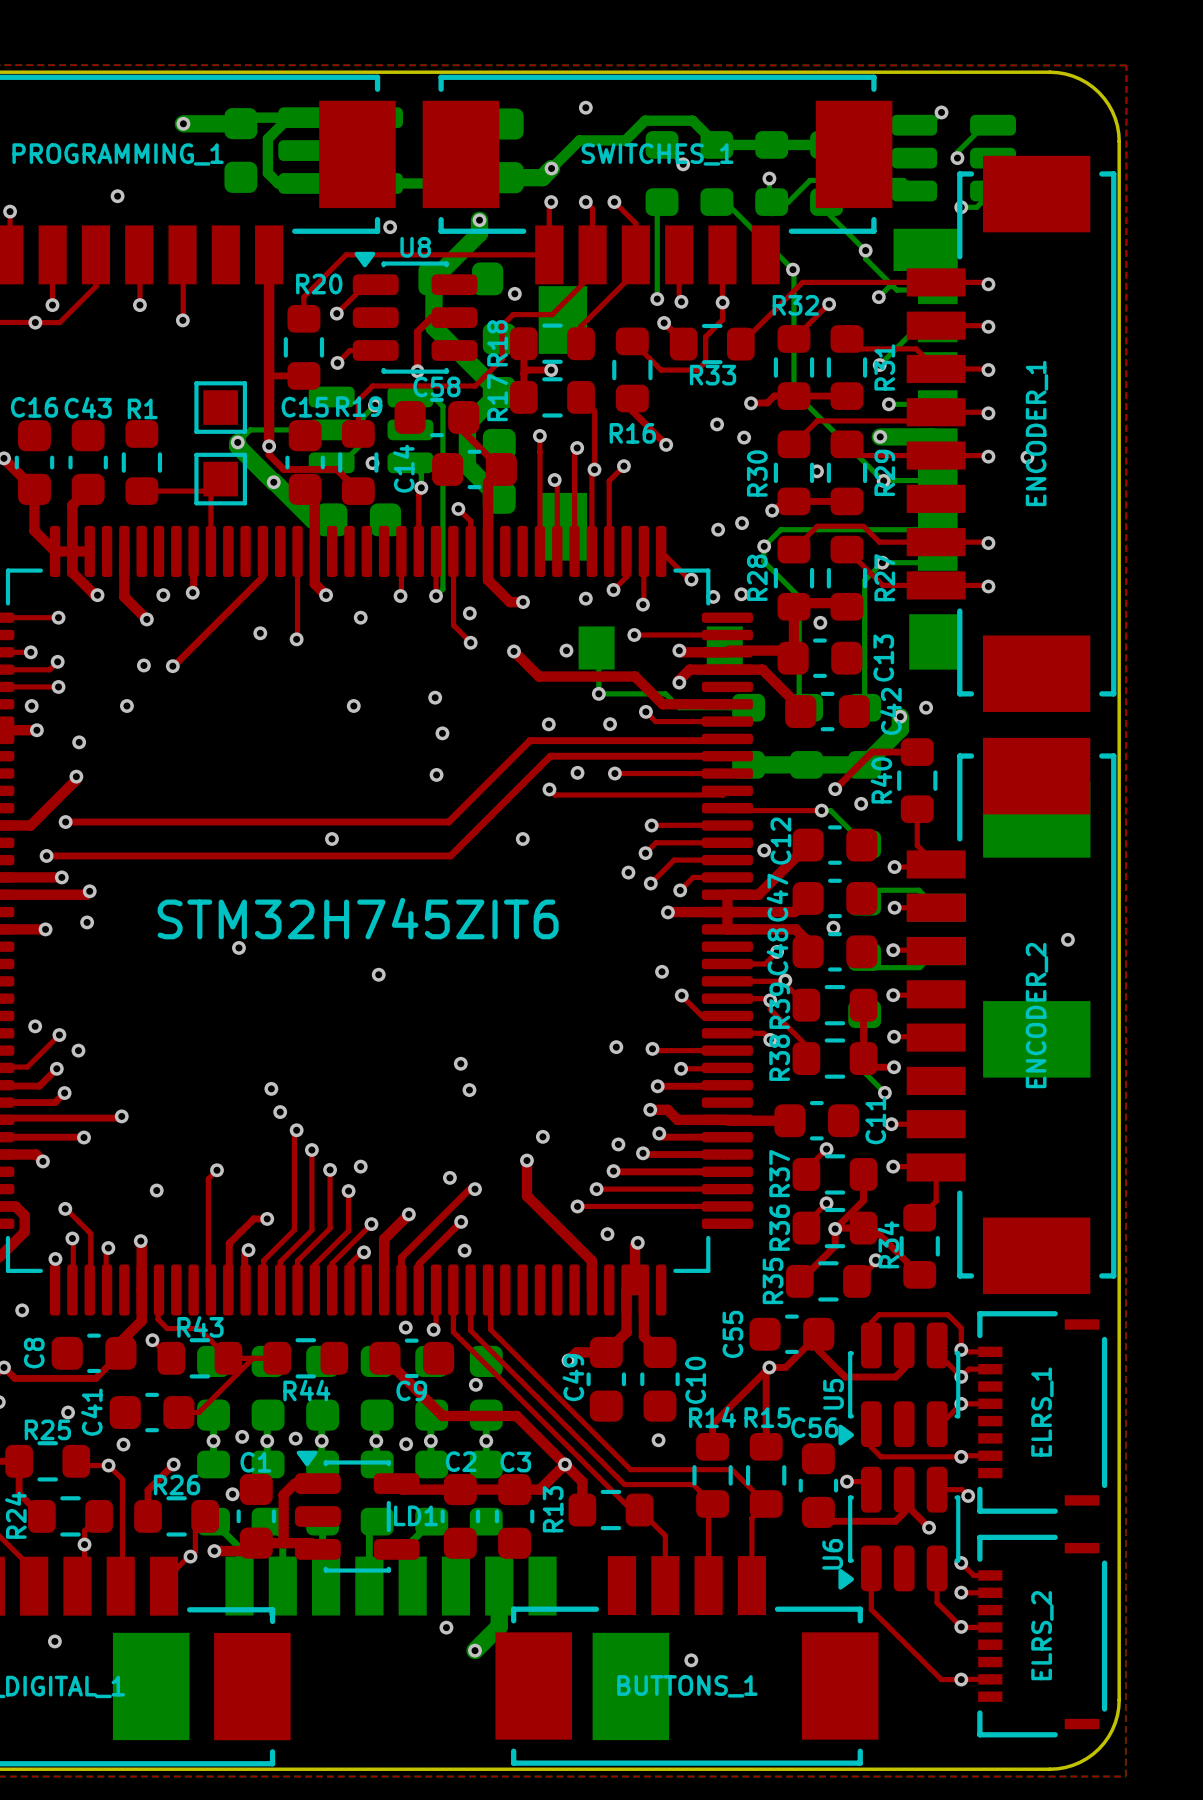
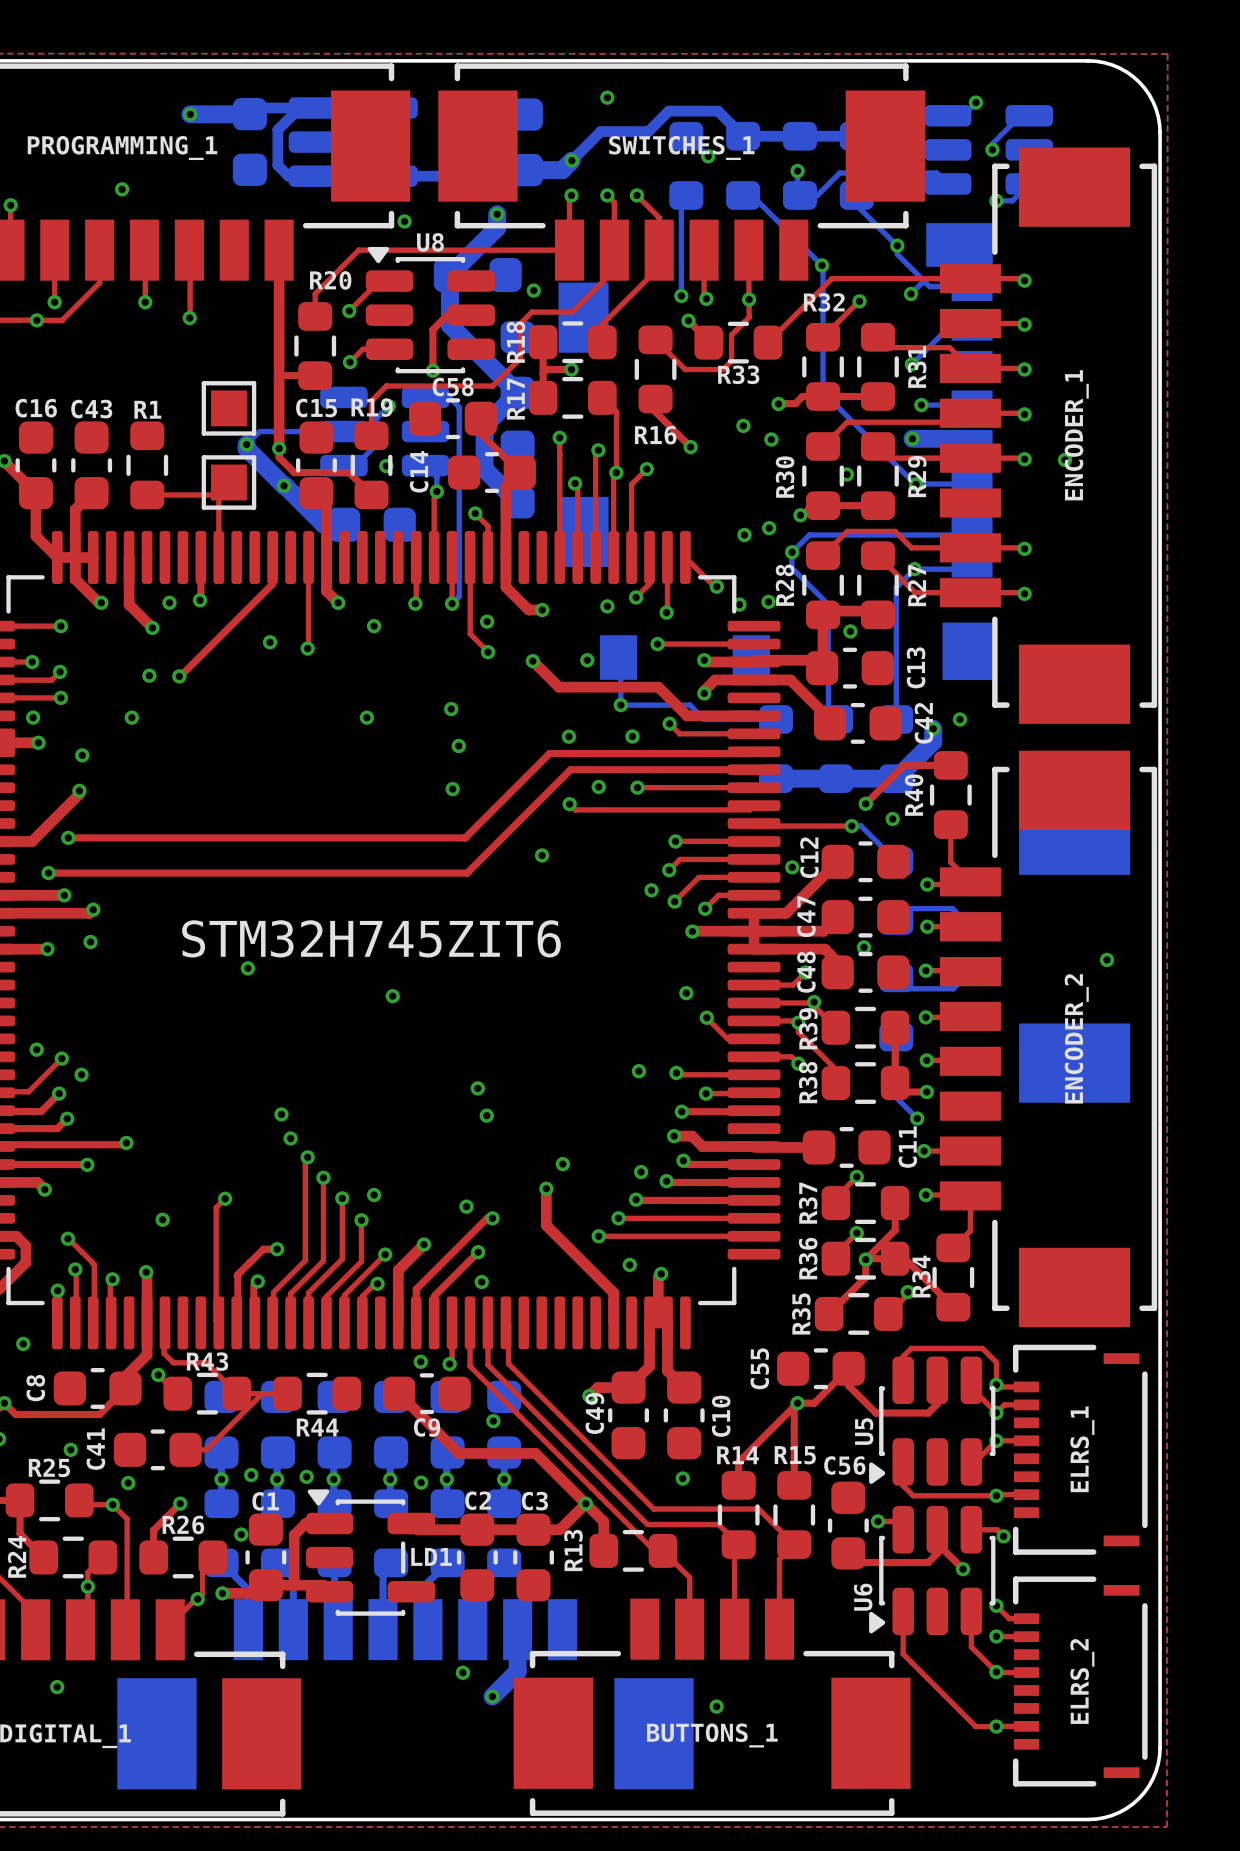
via: (331, 838) -> none

